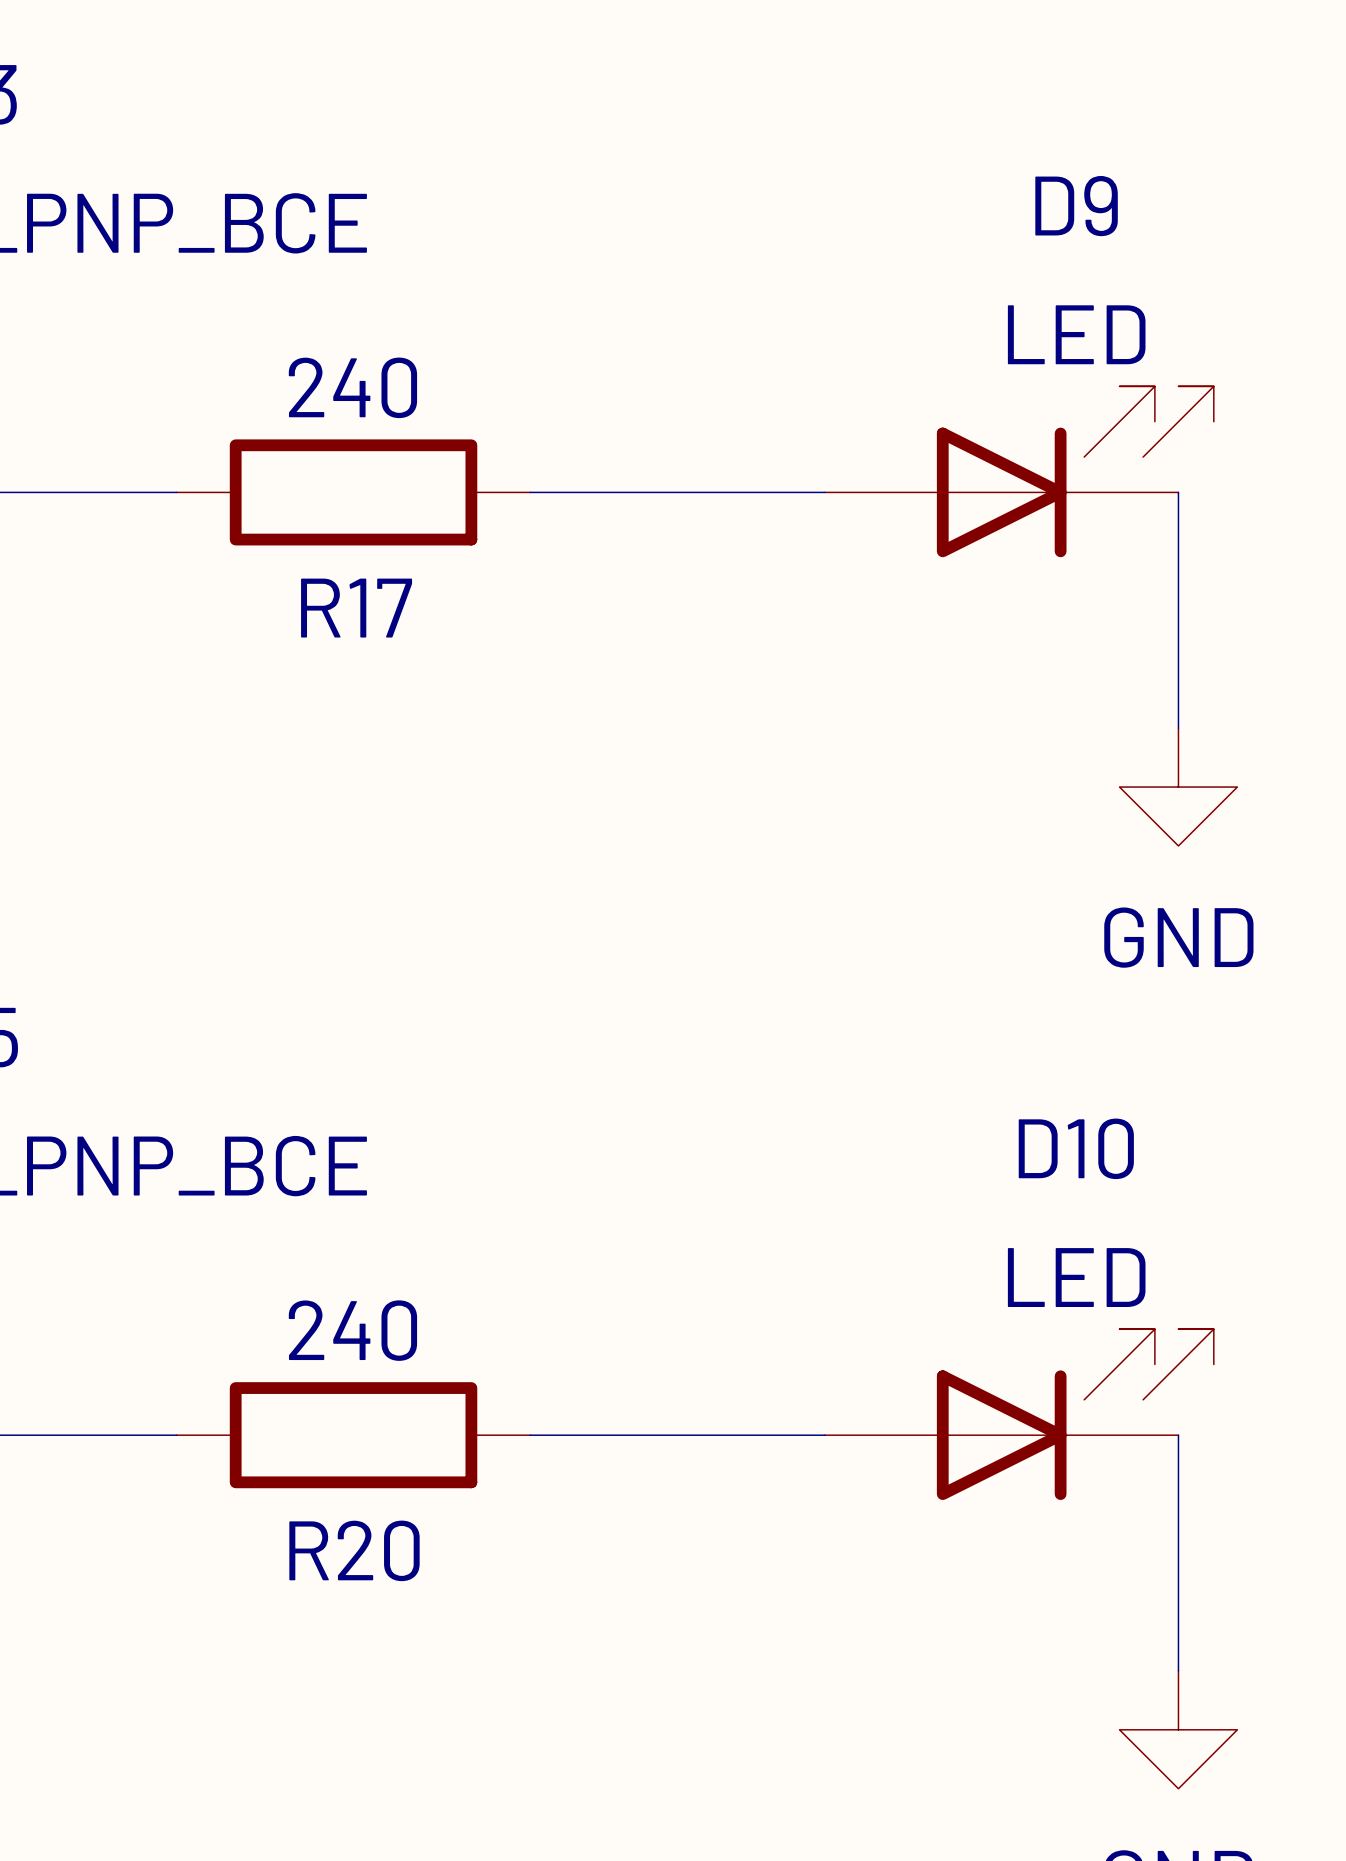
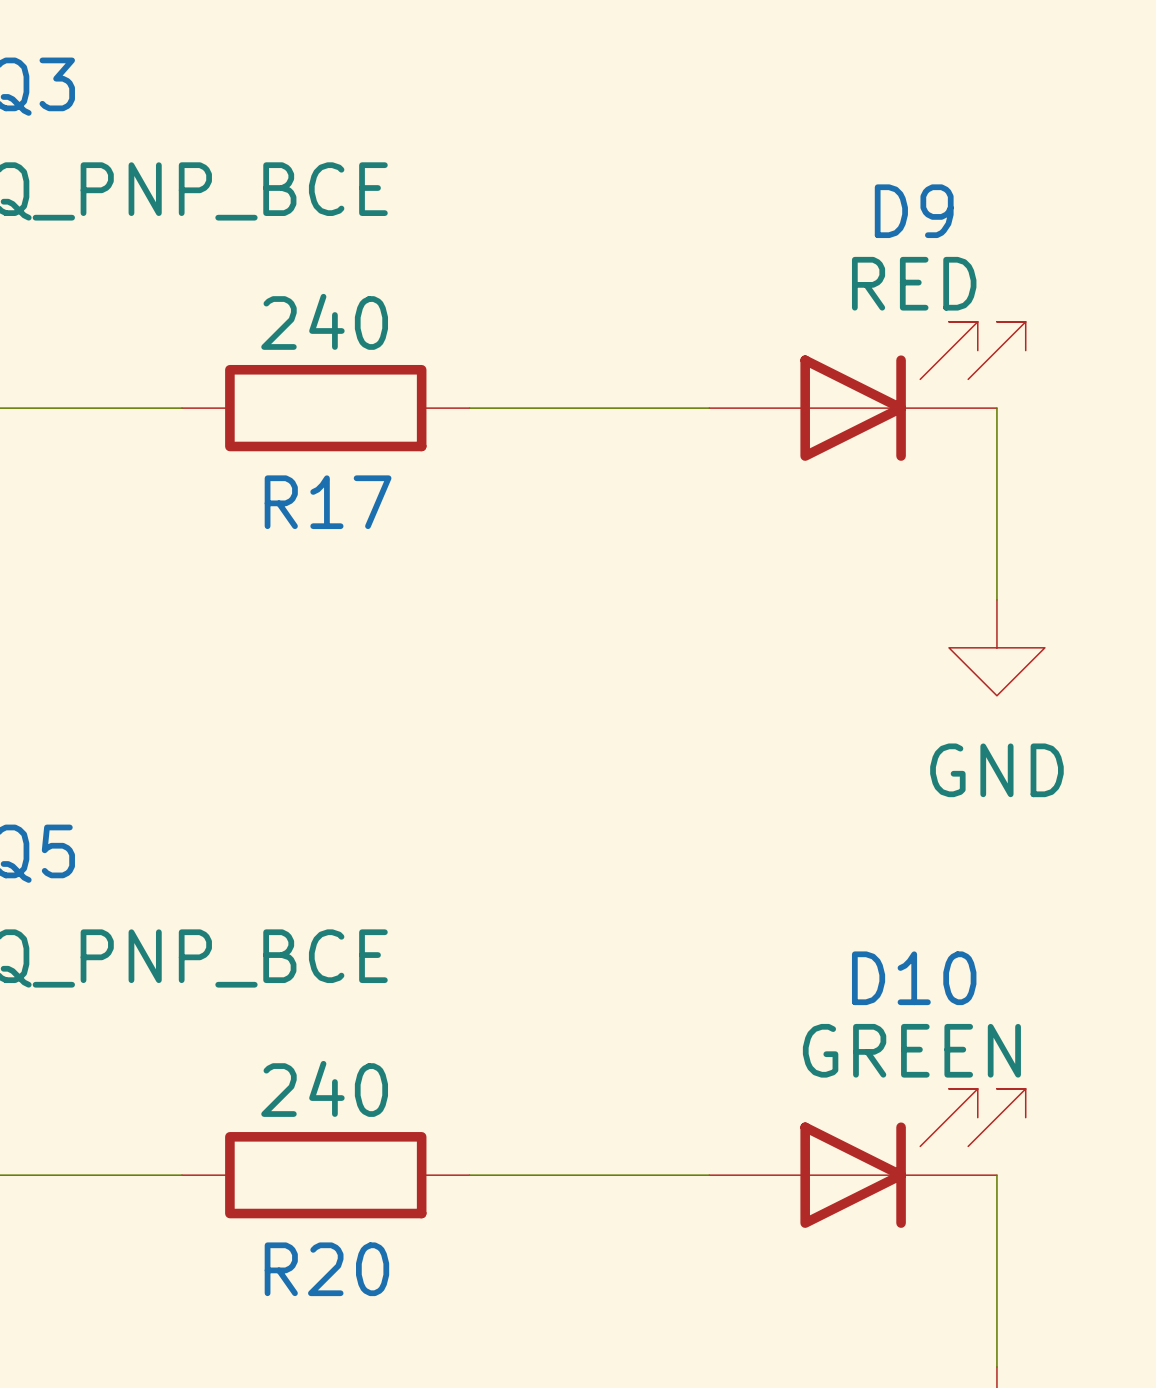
D9 name position: D9 (1076, 206) -> D9 (914, 211)
D9 value: LED (1076, 334) -> RED (914, 283)
D10 name position: D10 (1076, 1148) -> D10 (914, 978)
D10 value: LED (1076, 1277) -> GREEN (911, 1050)

